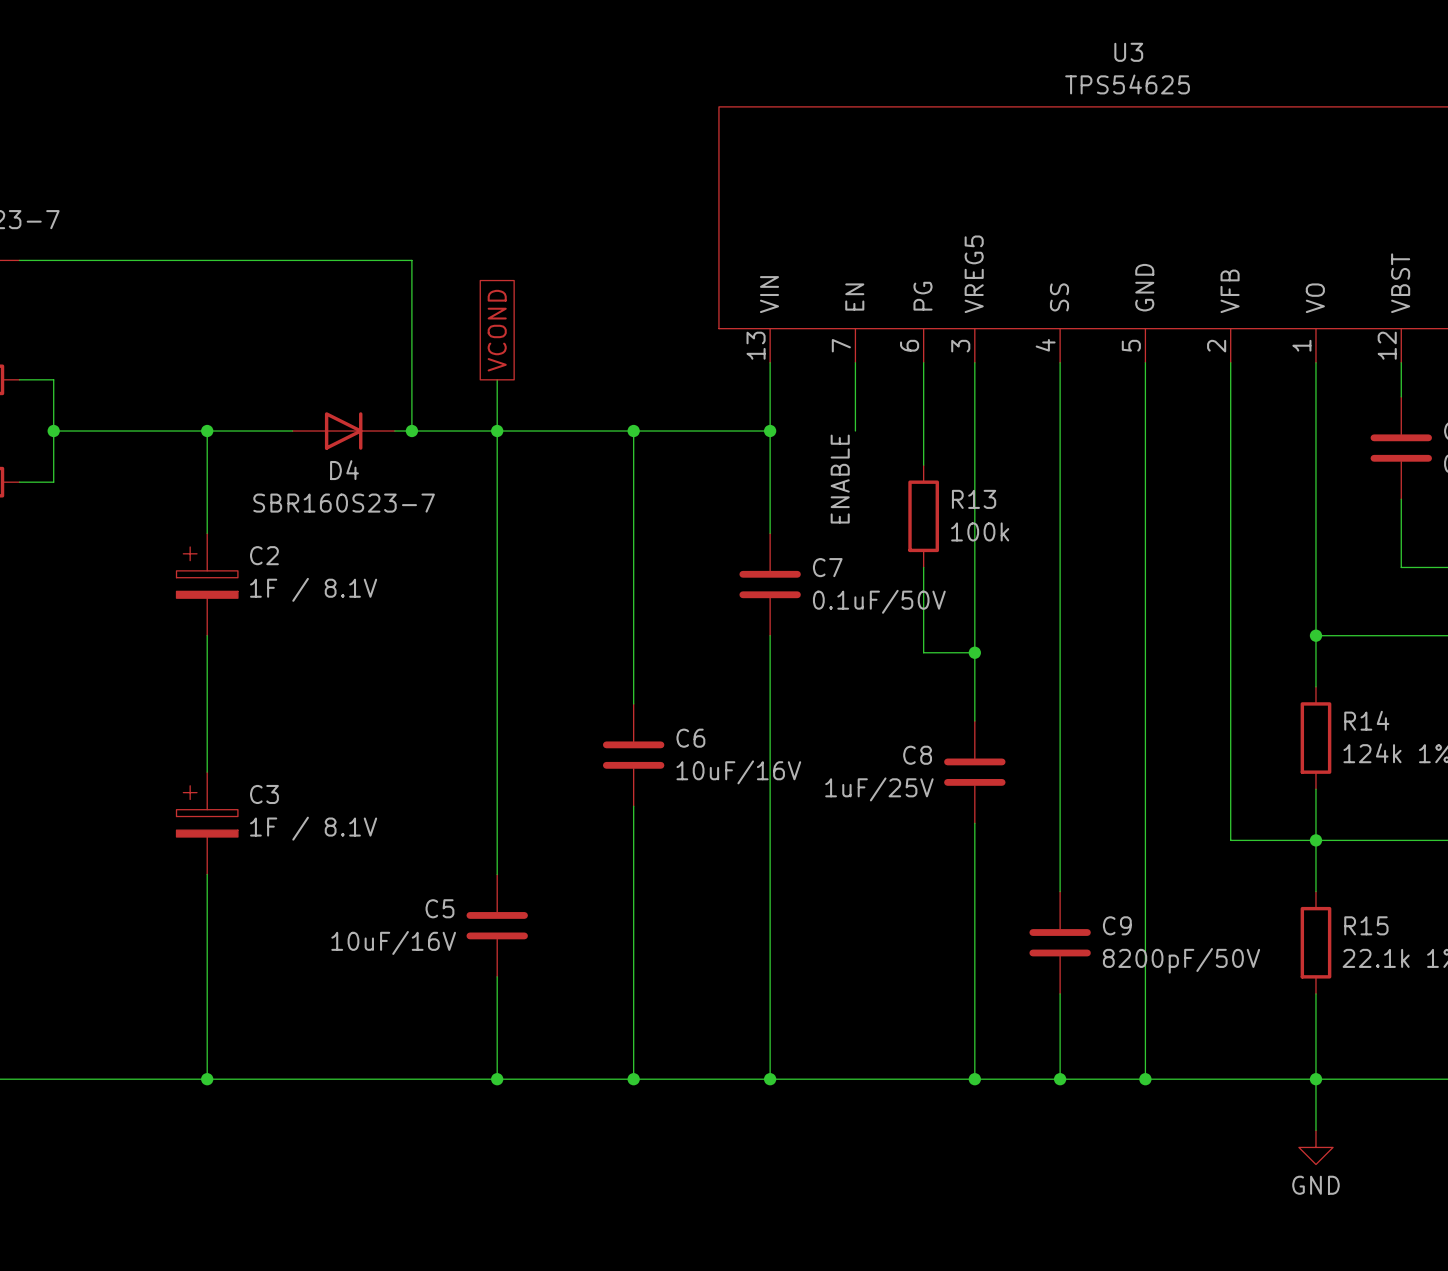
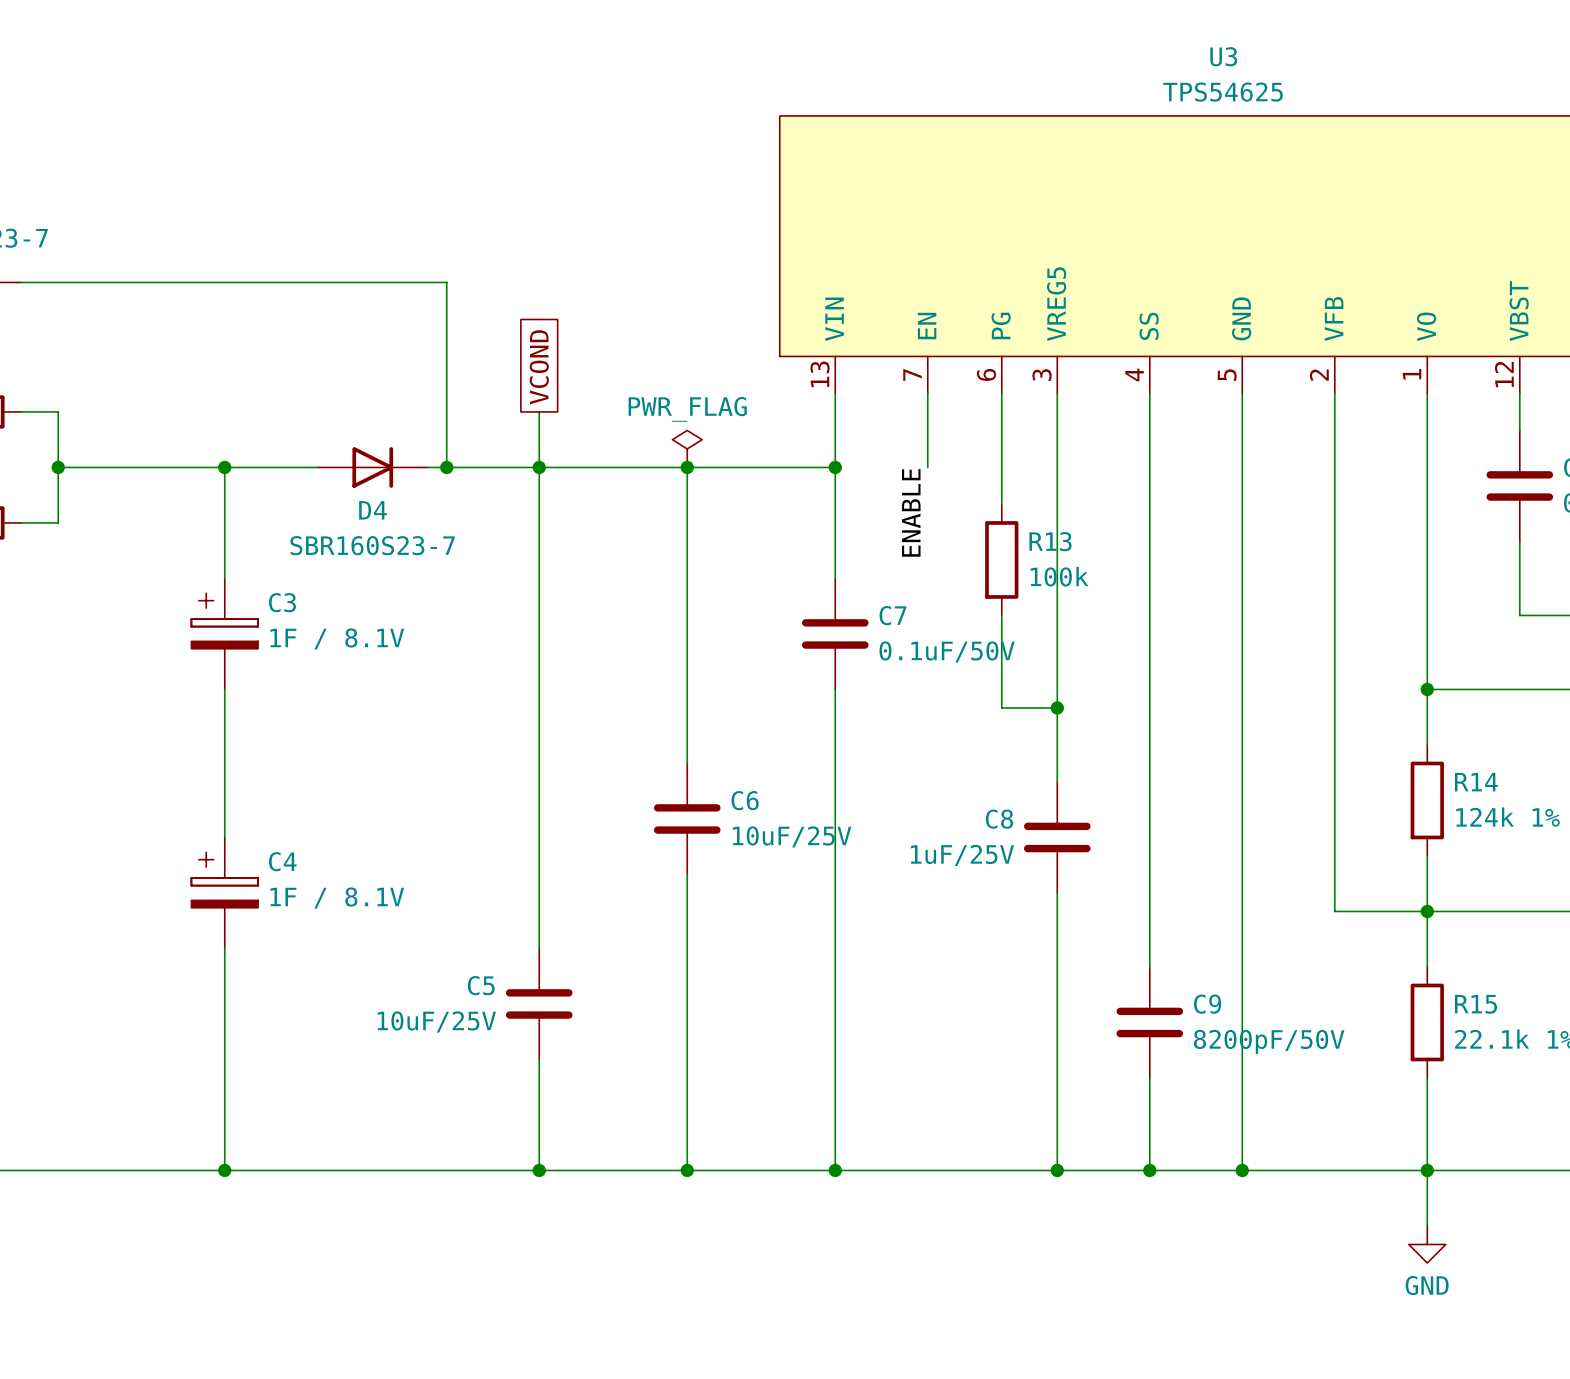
power symbol: none -> PWR_FLAG (687, 448)
C2: 1F / 8.1V (207, 584) -> none
C3 symbol: [176, 772, 238, 875] -> [191, 578, 259, 690]
C6 value: 10uF/16V (738, 772) -> 10uF/25V (792, 836)
C4: none -> 1F / 8.1V (224, 892)
C5 value: 10uF/16V (393, 942) -> 10uF/25V (436, 1021)

